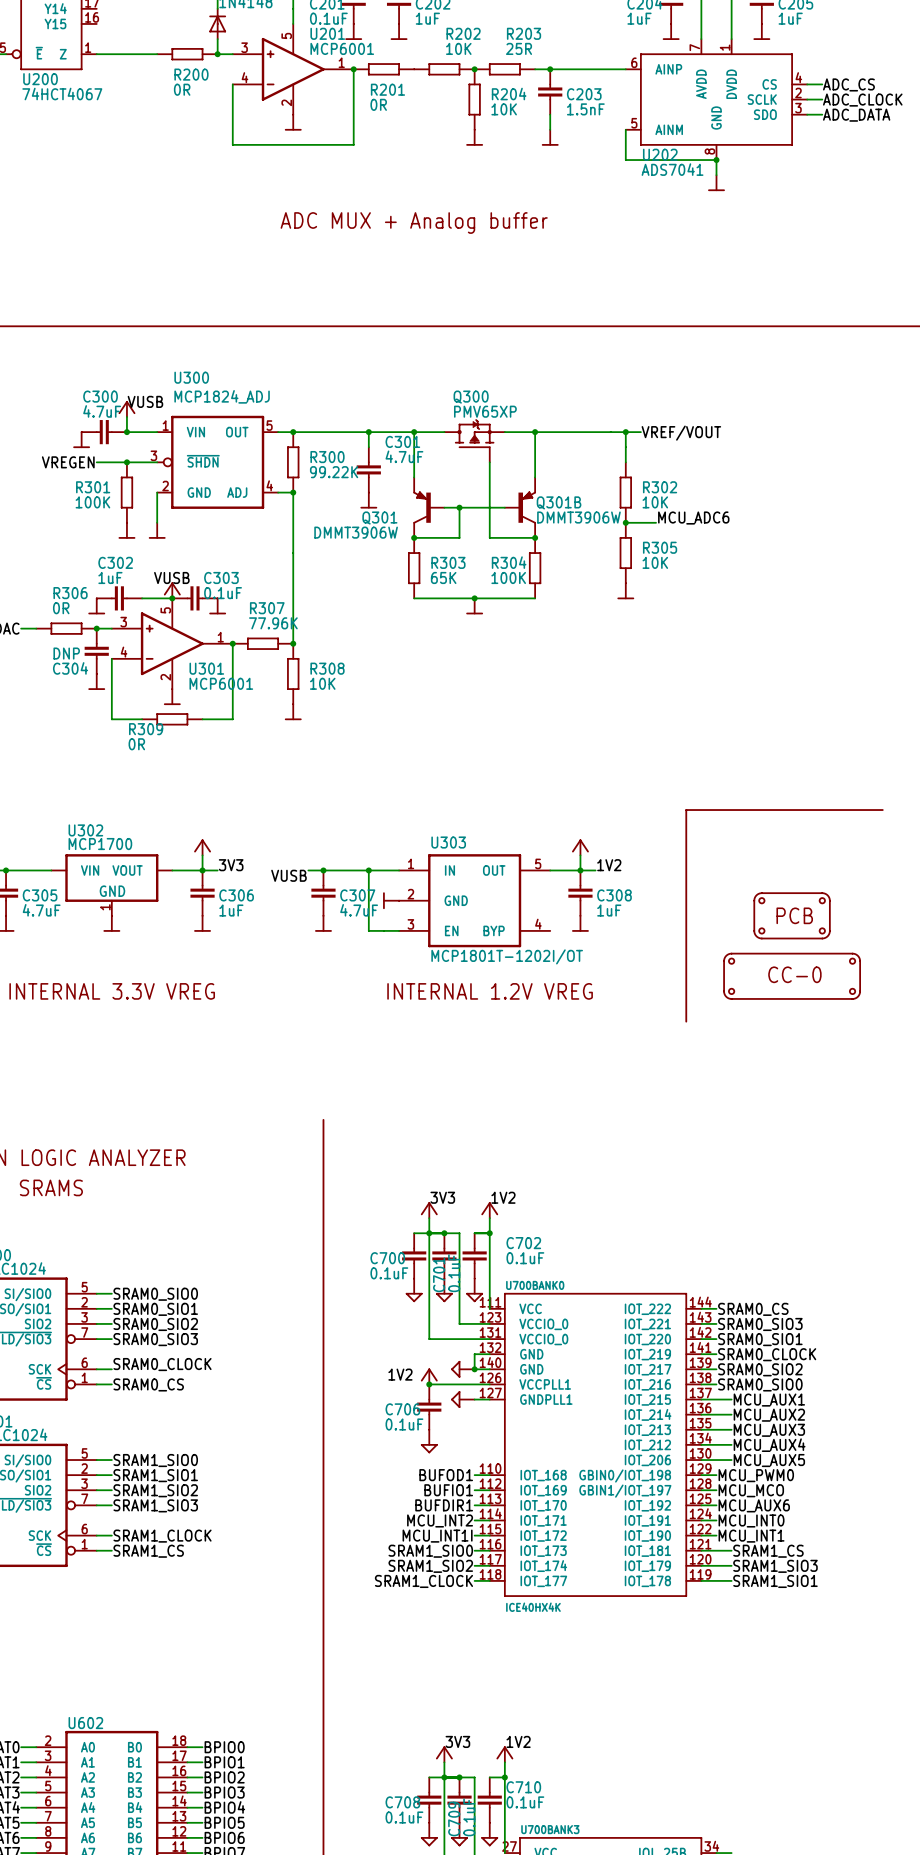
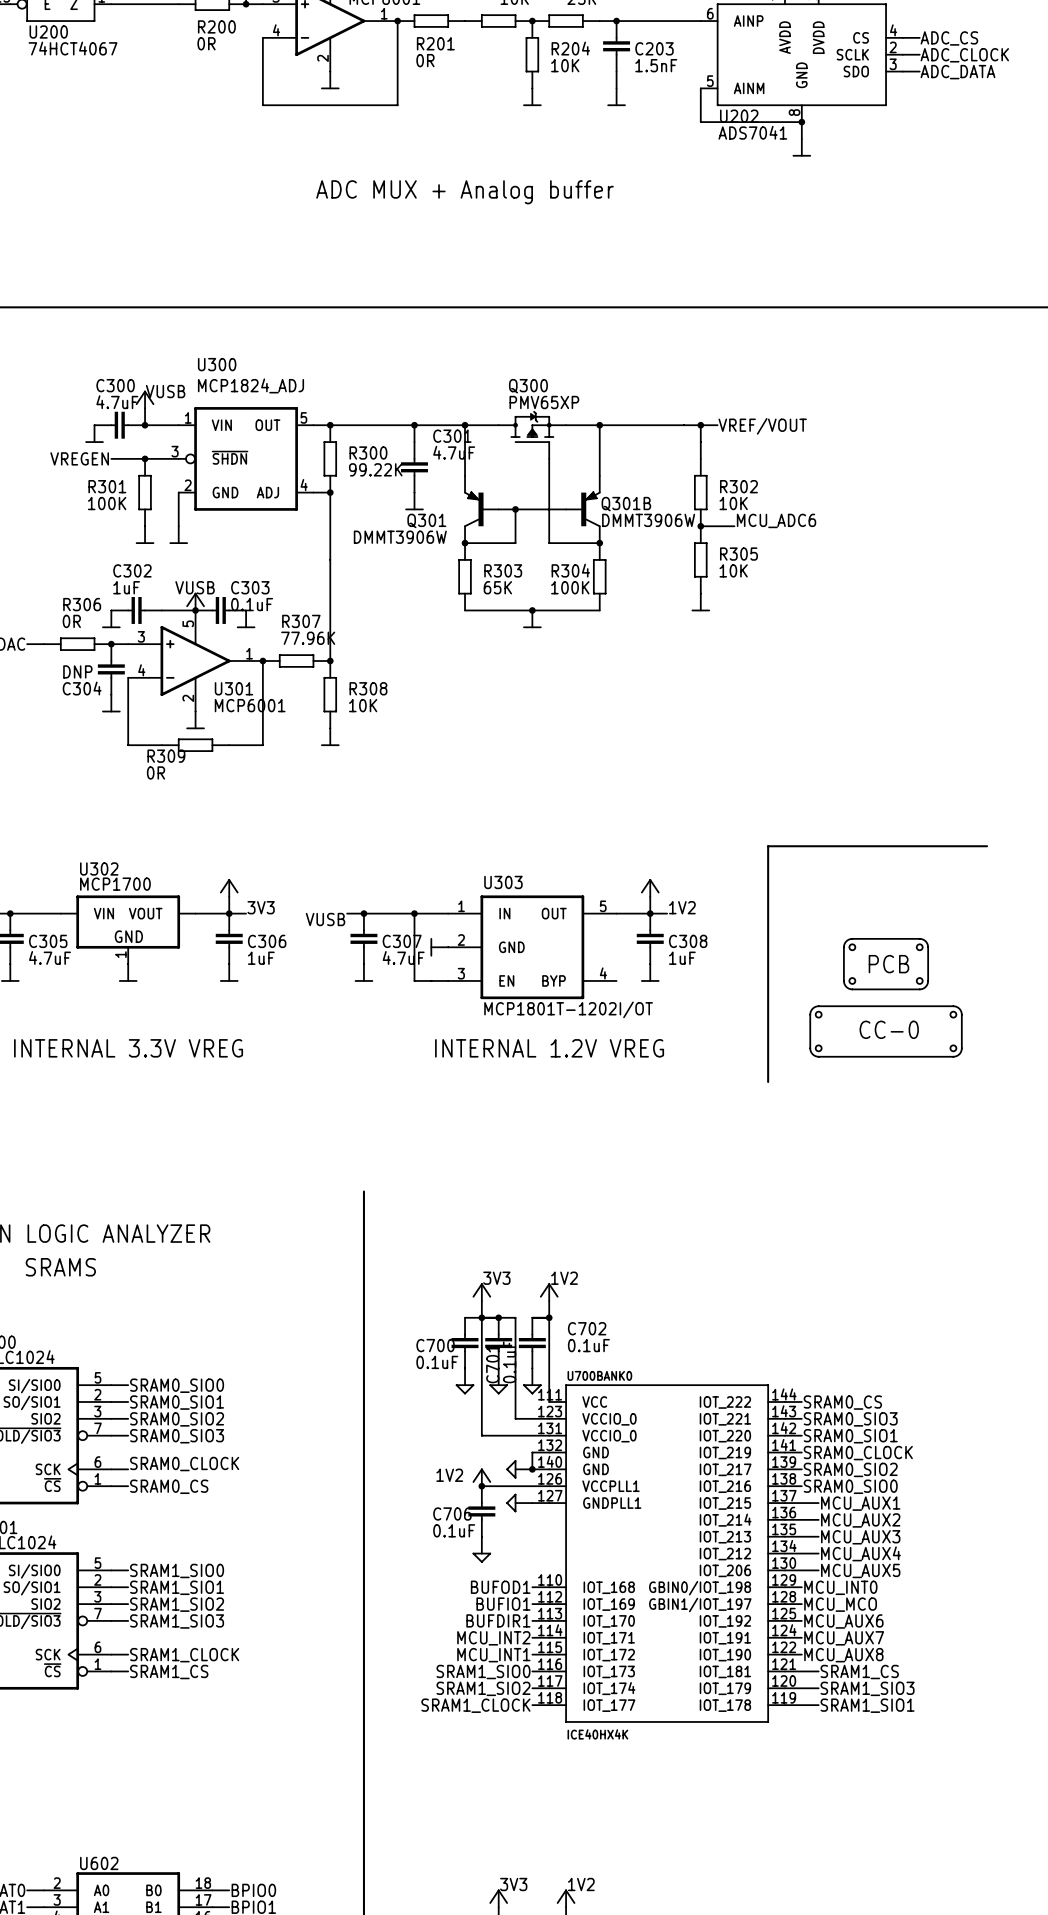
label: MCU_PWM0 (756, 1475) -> MCU_INT0 (840, 1587)
label: MCU_INT0 (751, 1520) -> MCU_AUX7 (844, 1638)
label: MCU_INT1I (437, 1536) -> MCU_INT1 (493, 1655)
label: MCU_INT1 (751, 1536) -> MCU_AUX8 (843, 1655)

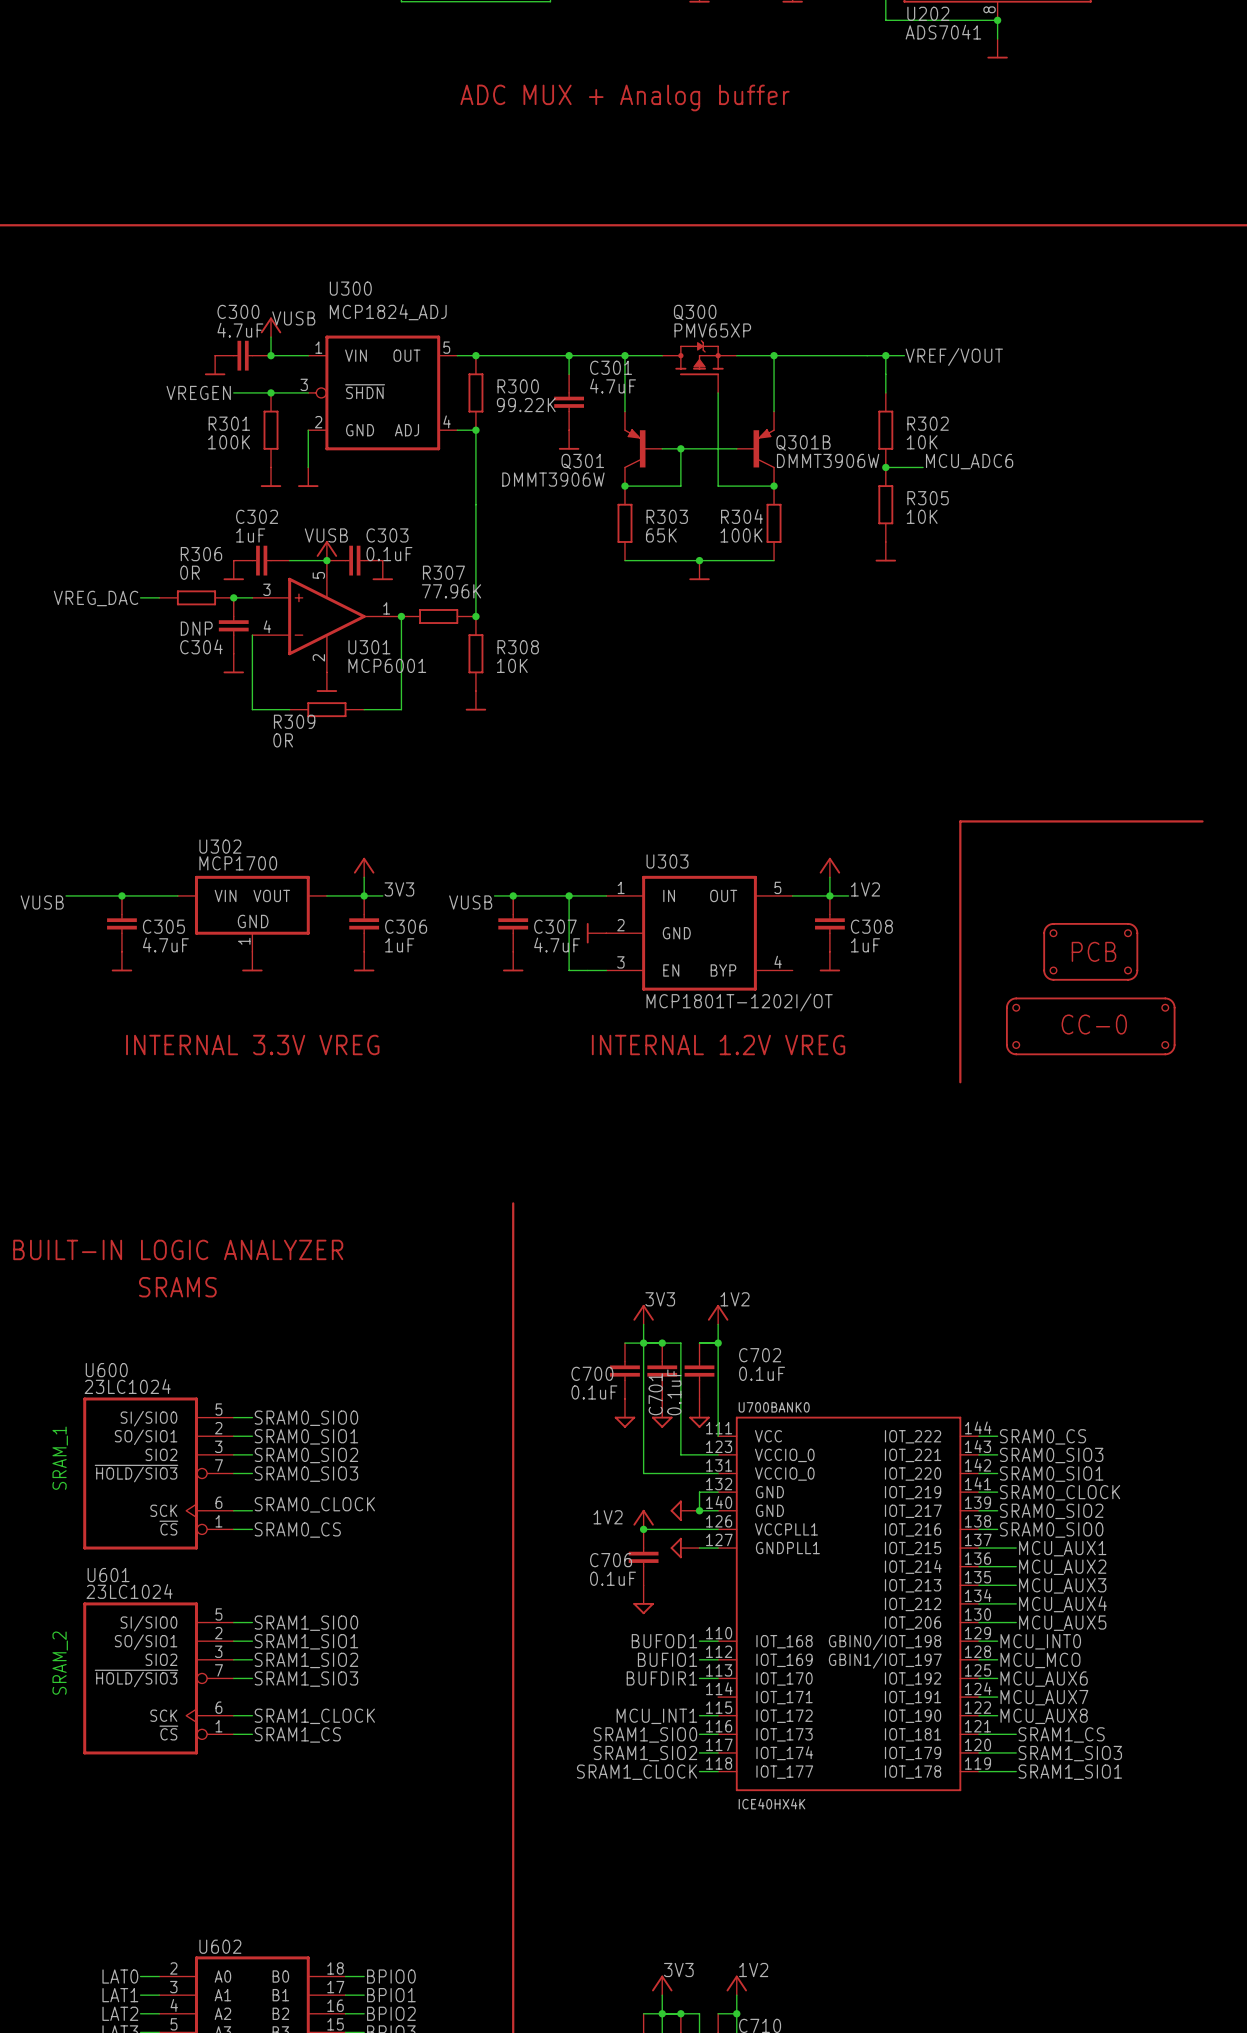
wire: (532, 1637) (549, 1637) -> none
label: MCU_INT2 (493, 1638) -> none

